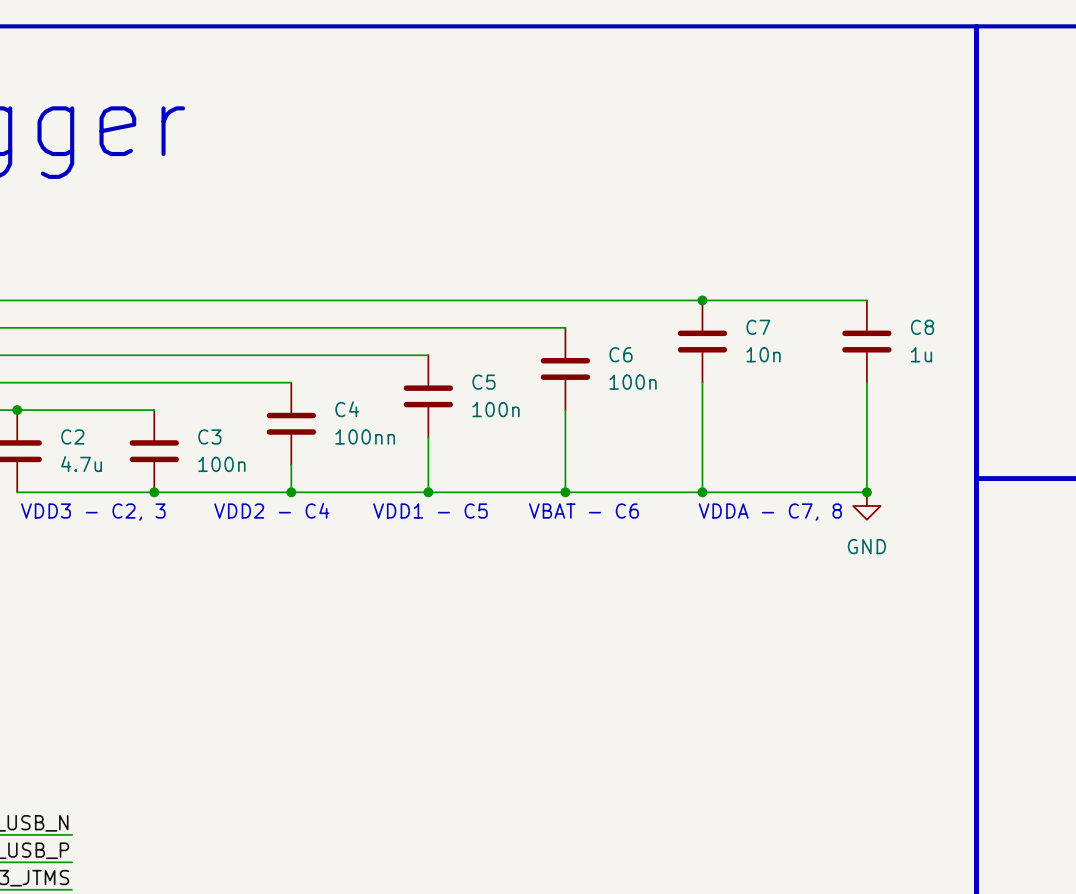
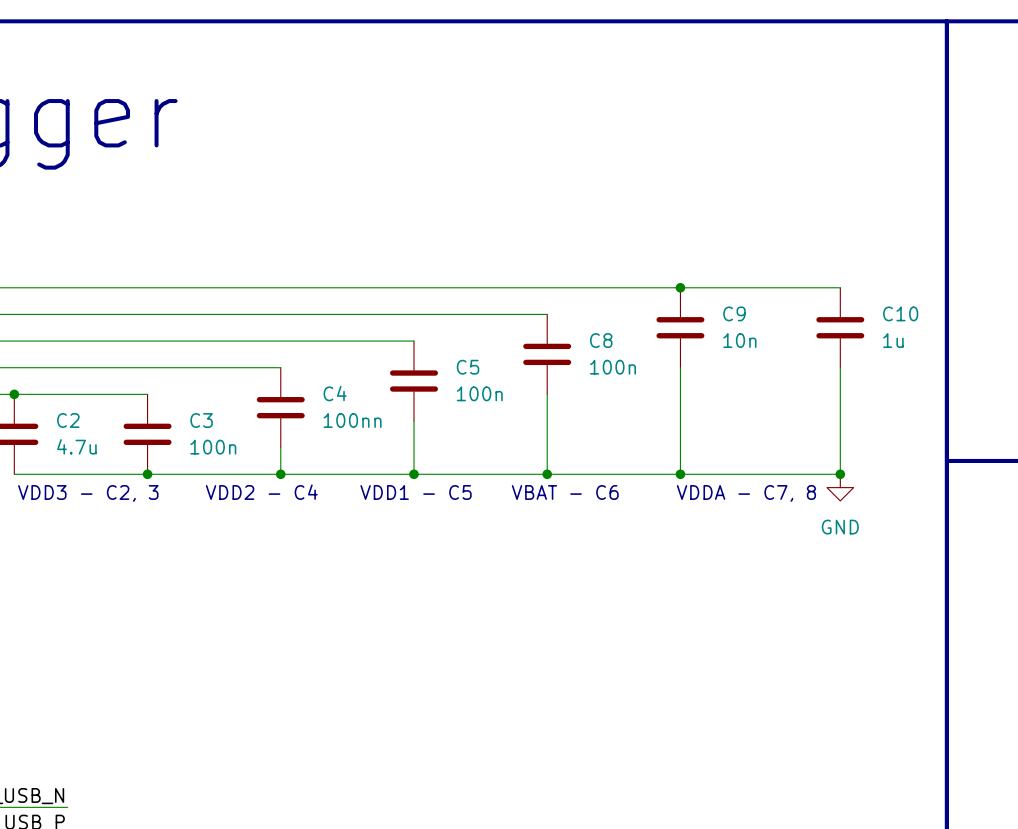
C7 name: C7 (758, 327) -> C9 (734, 313)
C8 name: C8 (922, 327) -> C10 (900, 313)
C6 name: C6 (620, 354) -> C8 (601, 340)

